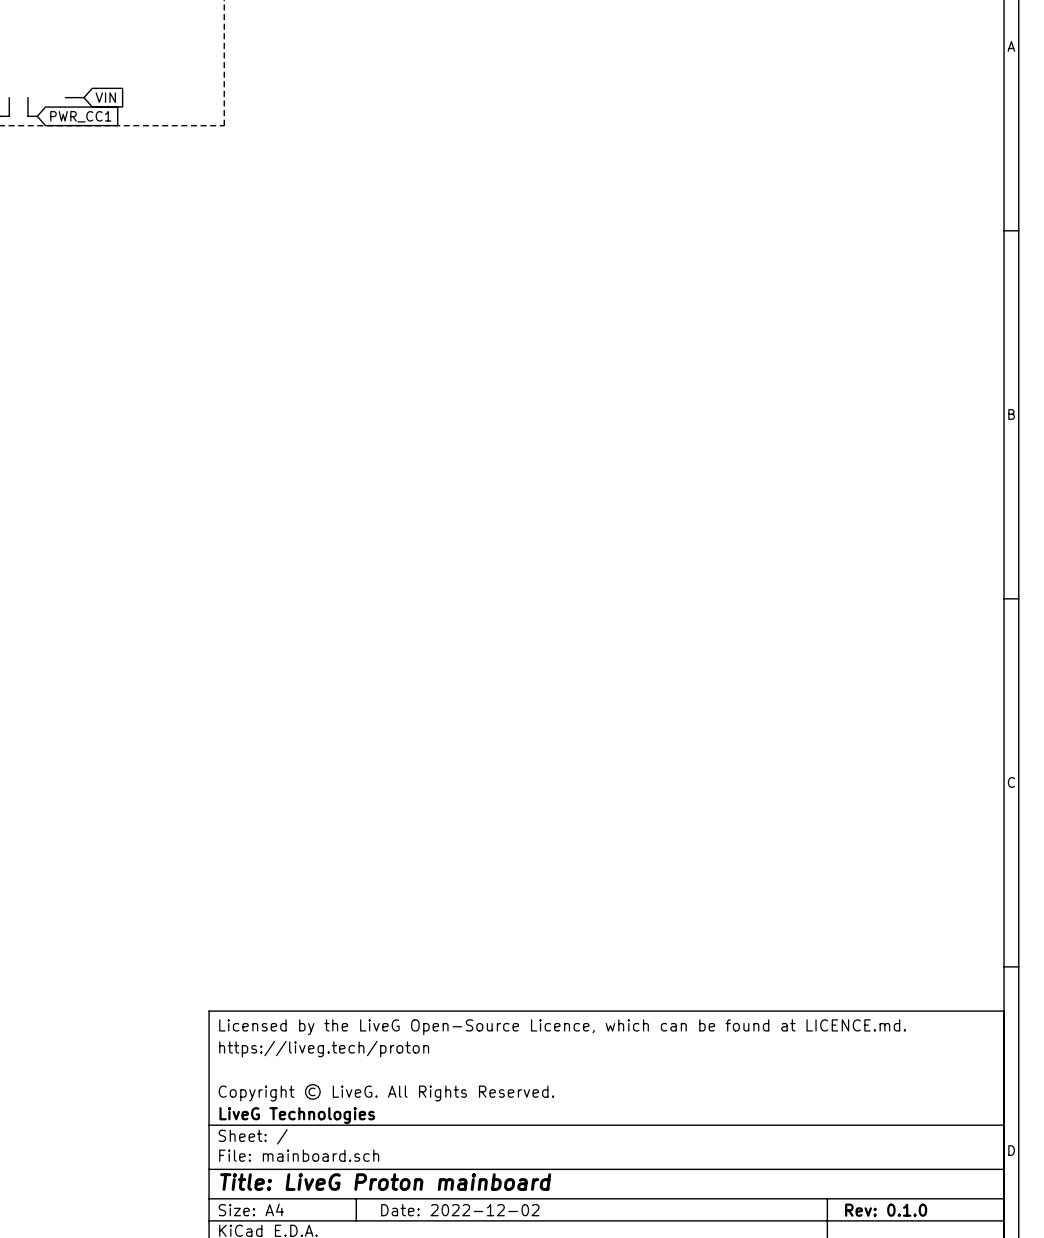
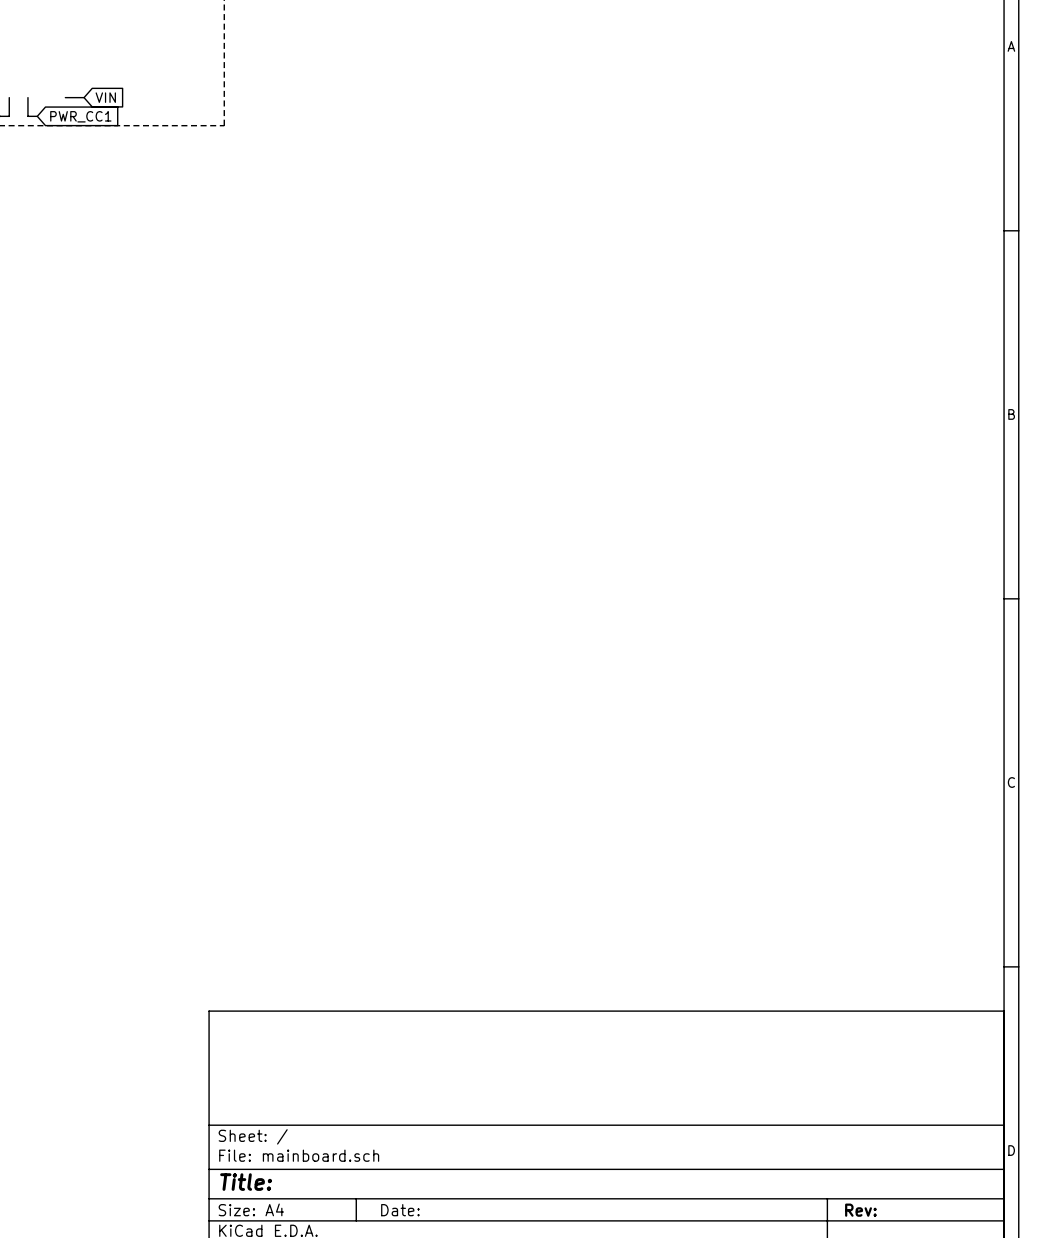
title block: Licensed by the LiveG Open-Source Licence, which can be found at LICENCE.md. (562, 1027) -> none
title block: https://liveg.tech/proton (324, 1049) -> none
title block: Copyright © LiveG. All Rights Reserved. (386, 1092) -> none
title block: LiveG Technologies (297, 1115) -> none
title block: Title: LiveG Proton mainboard (385, 1182) -> Title: (246, 1182)
title block: Date: 2022-12-02 (460, 1210) -> Date: (400, 1210)
title block: Rev: 0.1.0 (886, 1210) -> Rev: (860, 1210)

